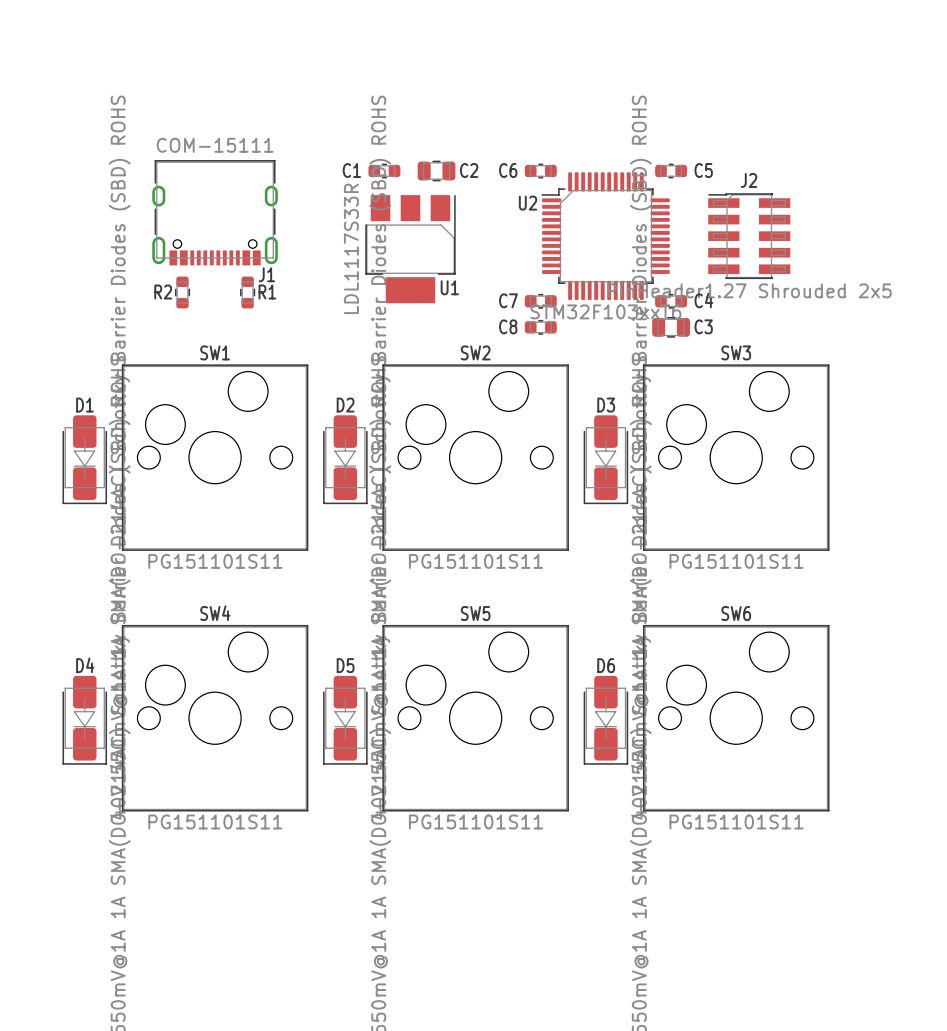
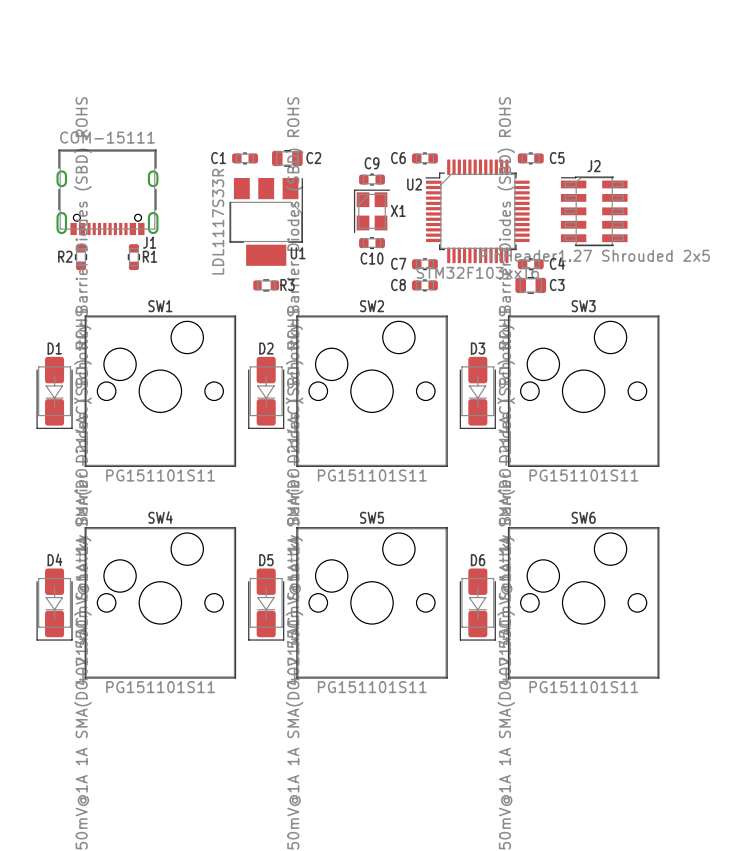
C1 position: (384, 171) -> (245, 158)
C2 position: (436, 171) -> (287, 158)
C9: none -> (372, 179)
J1 position: (215, 212) -> (107, 192)
X1: none -> (372, 211)
U1 position: (410, 249) -> (266, 221)
C10: none -> (372, 243)
R2: none -> (81, 257)
R2 name: R2 (163, 292) -> R1 (149, 256)
R1: (247, 292) -> none
R3: none -> (266, 285)

